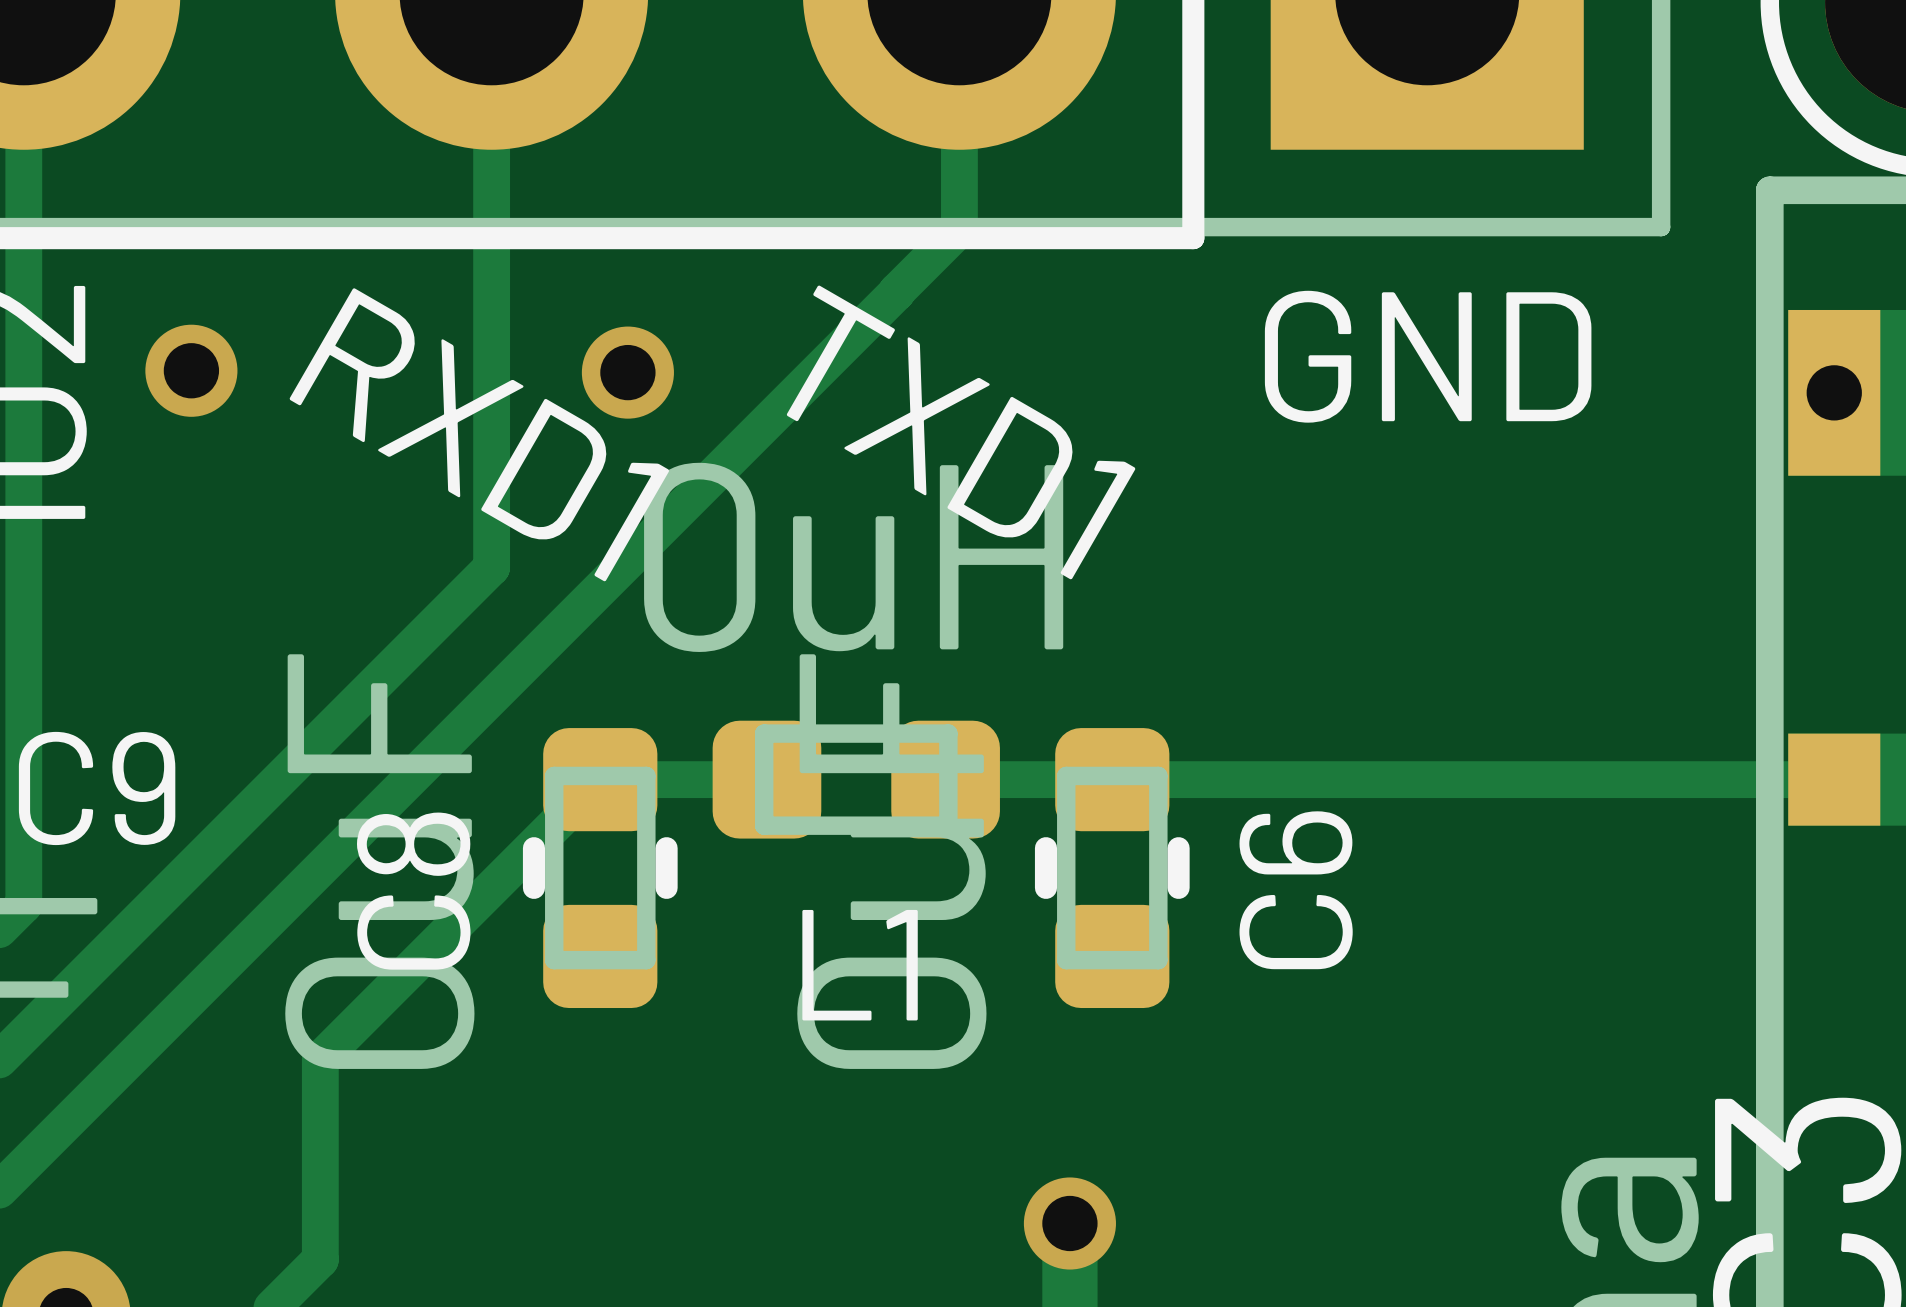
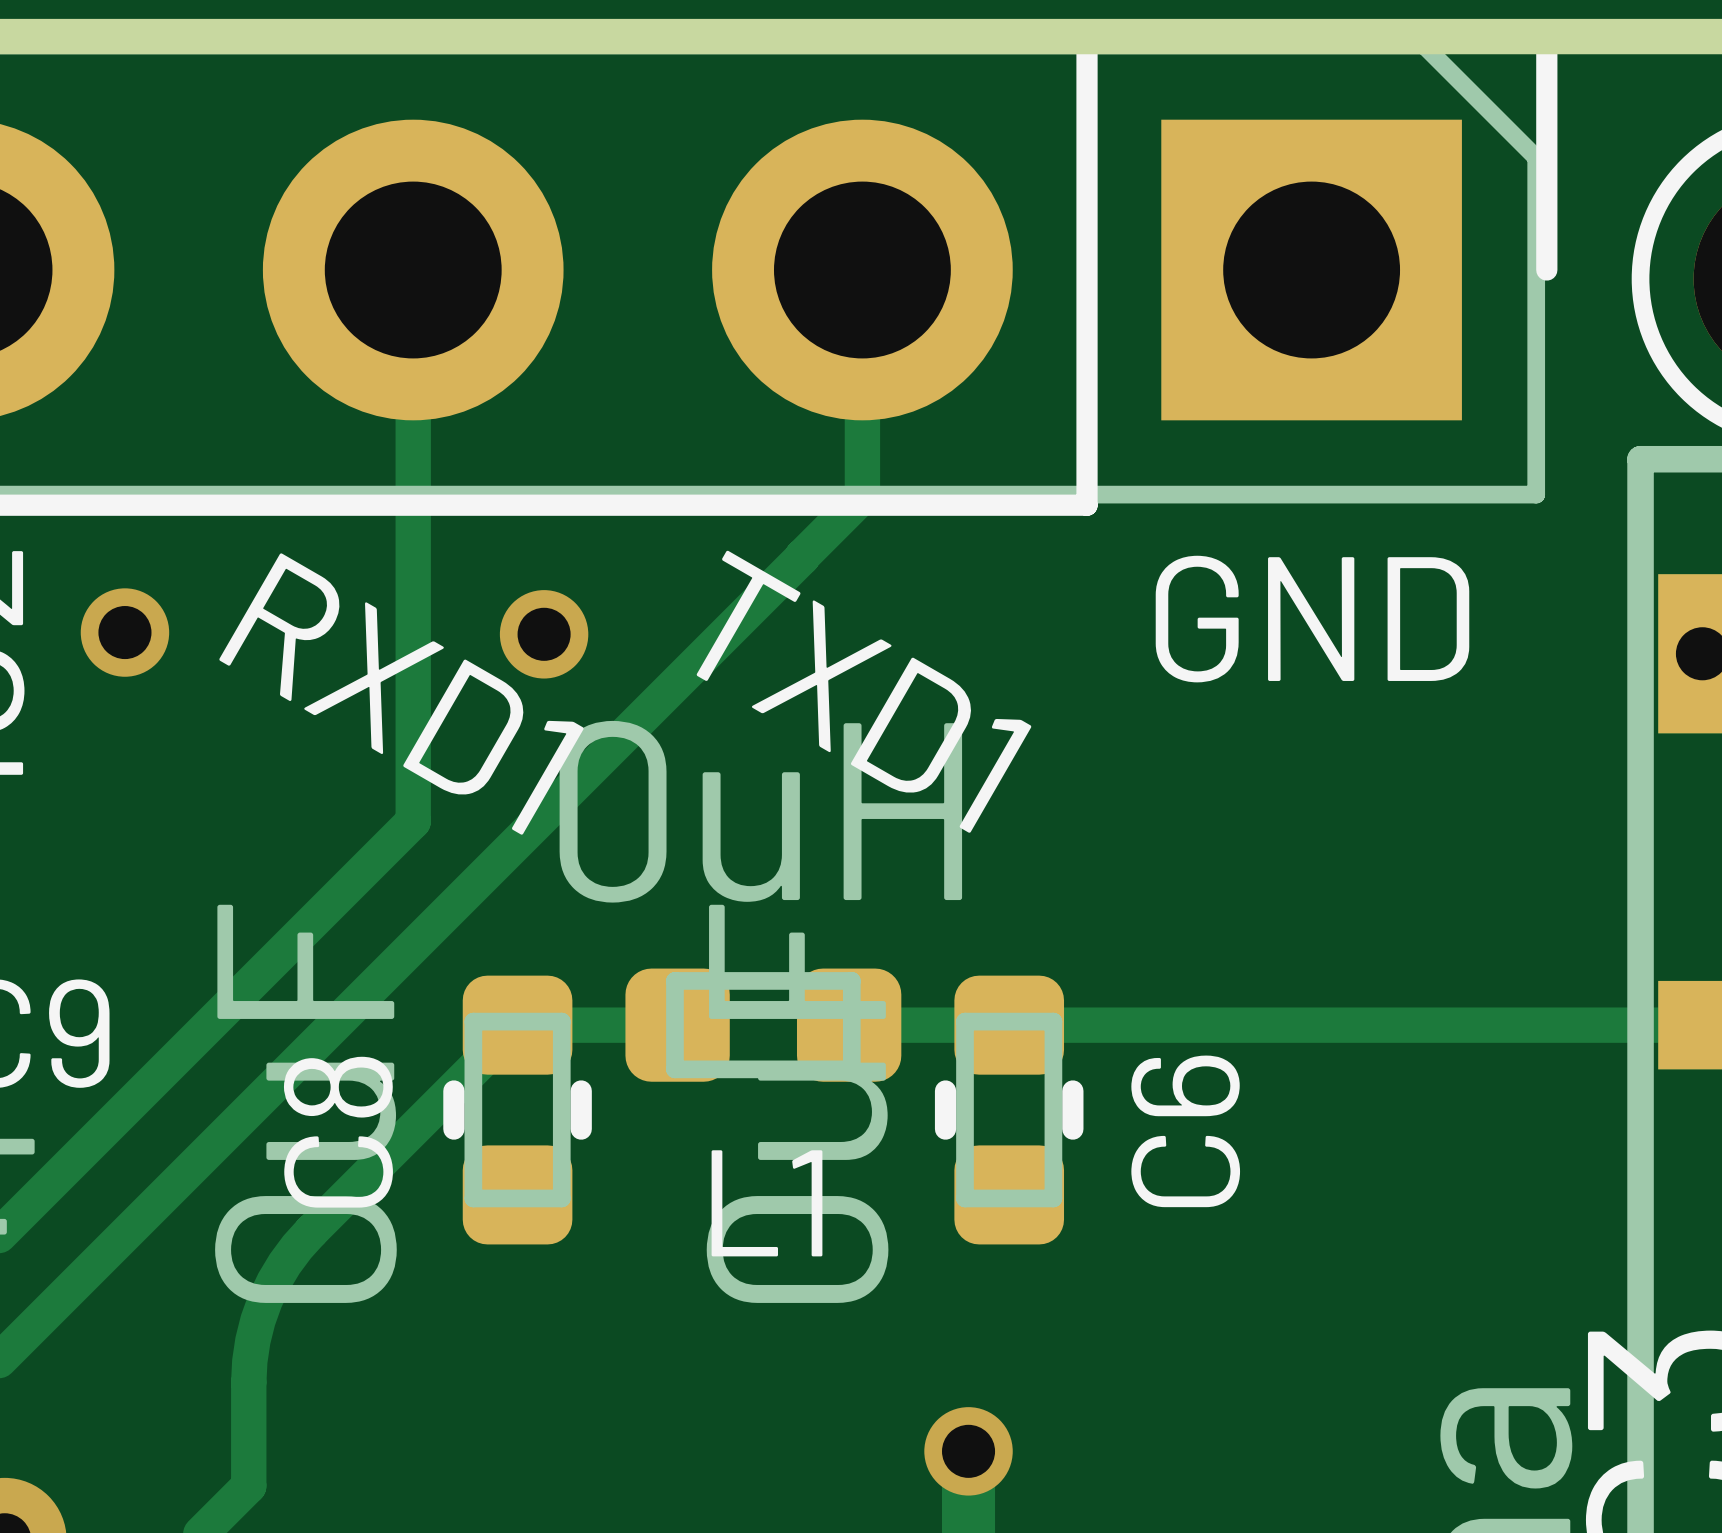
track: (385, 994) (320, 1059) (320, 1151) -> (311, 1231) (284, 1263) (265, 1300) (252, 1340) (248, 1382)

